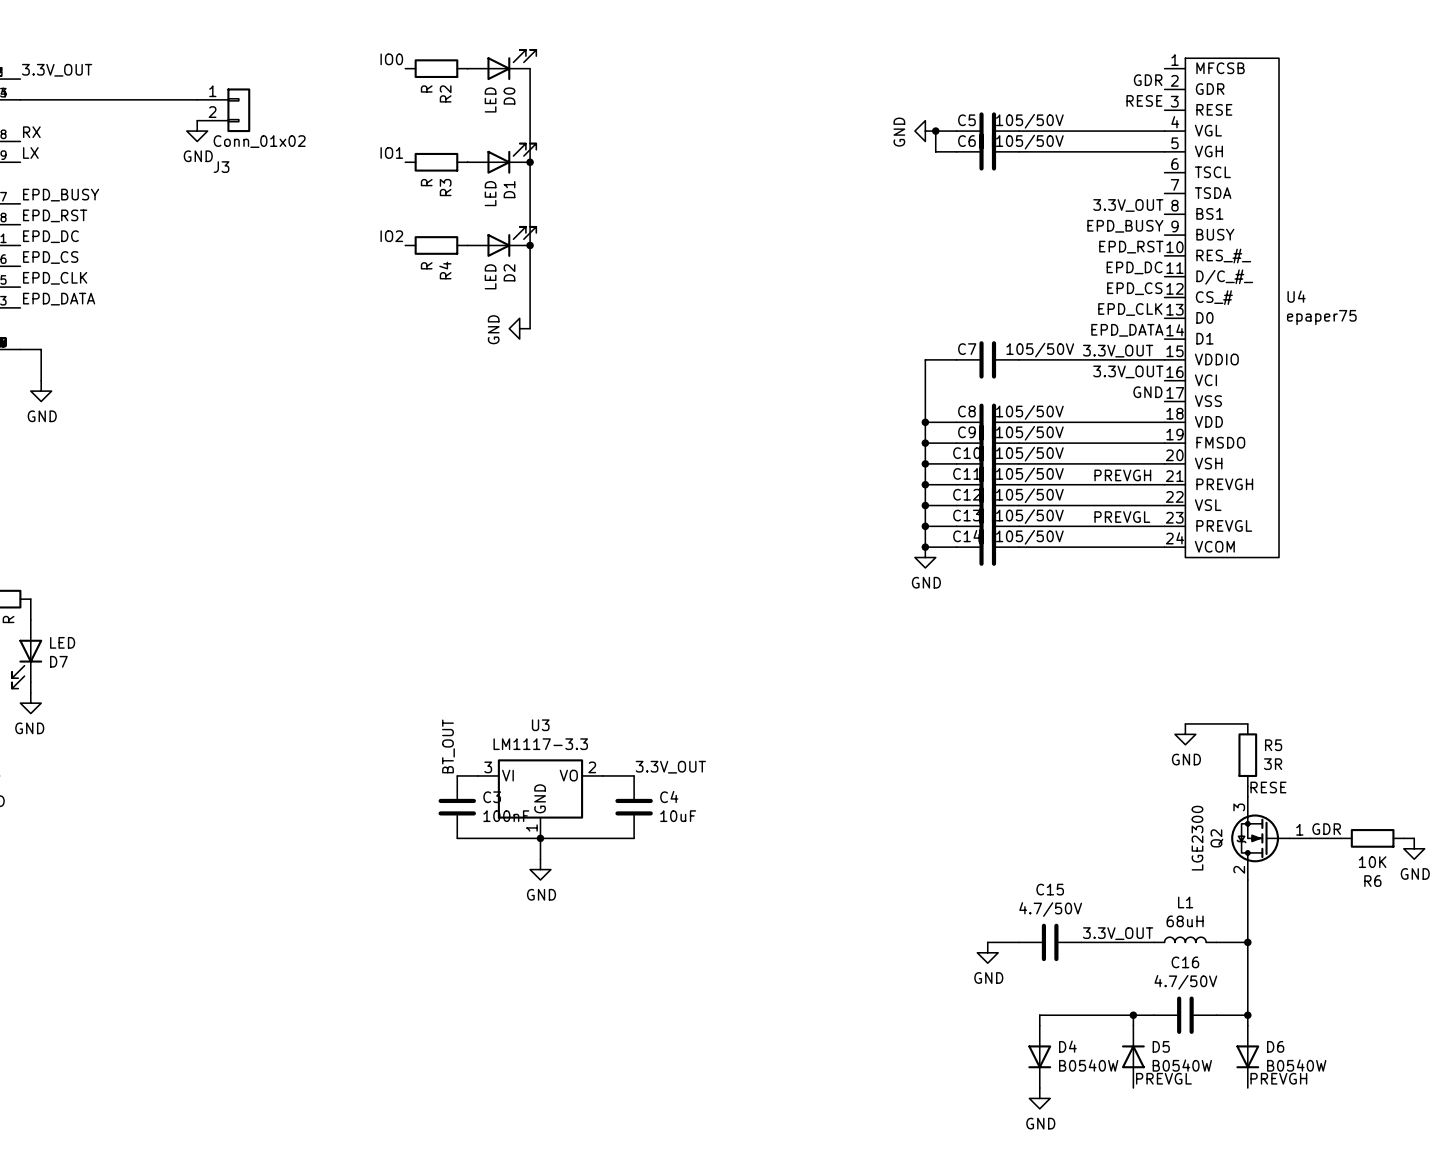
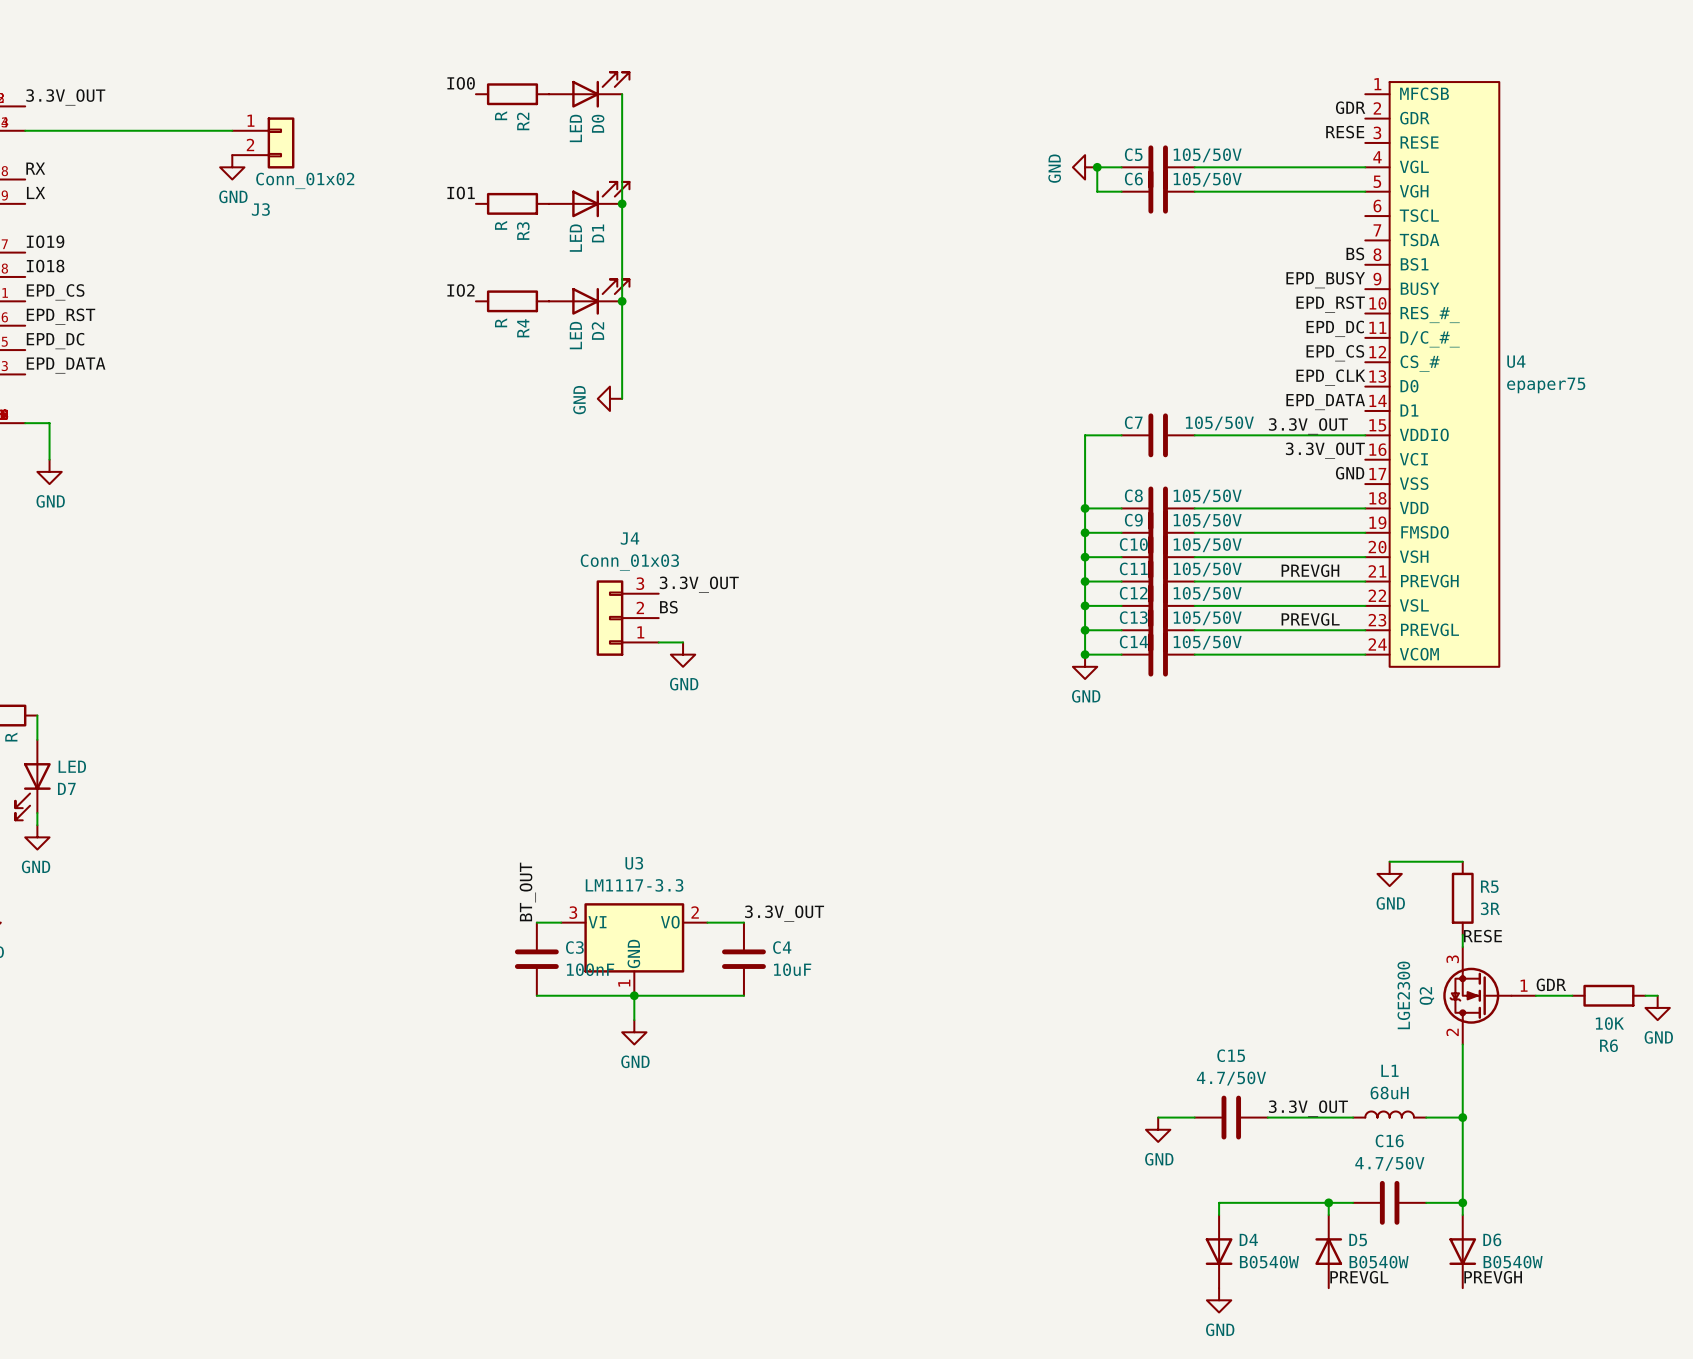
label: EPD_BUSY (61, 195) -> IO19 (45, 241)
label: 3.3V_OUT (1128, 205) -> BS (1355, 253)
label: EPD_RST (55, 215) -> IO18 (45, 266)
label: EPD_DC (50, 236) -> EPD_CS (55, 292)
label: EPD_CS (50, 257) -> EPD_RST (61, 316)
label: EPD_CLK (55, 278) -> EPD_DC (55, 341)
label: none -> 3.3V_OUT (699, 584)
label: none -> BS (668, 607)
J4: none -> Conn_01x03 (627, 618)
wire: none -> (658, 642) (683, 642)
power symbol: none -> GND (683, 654)

